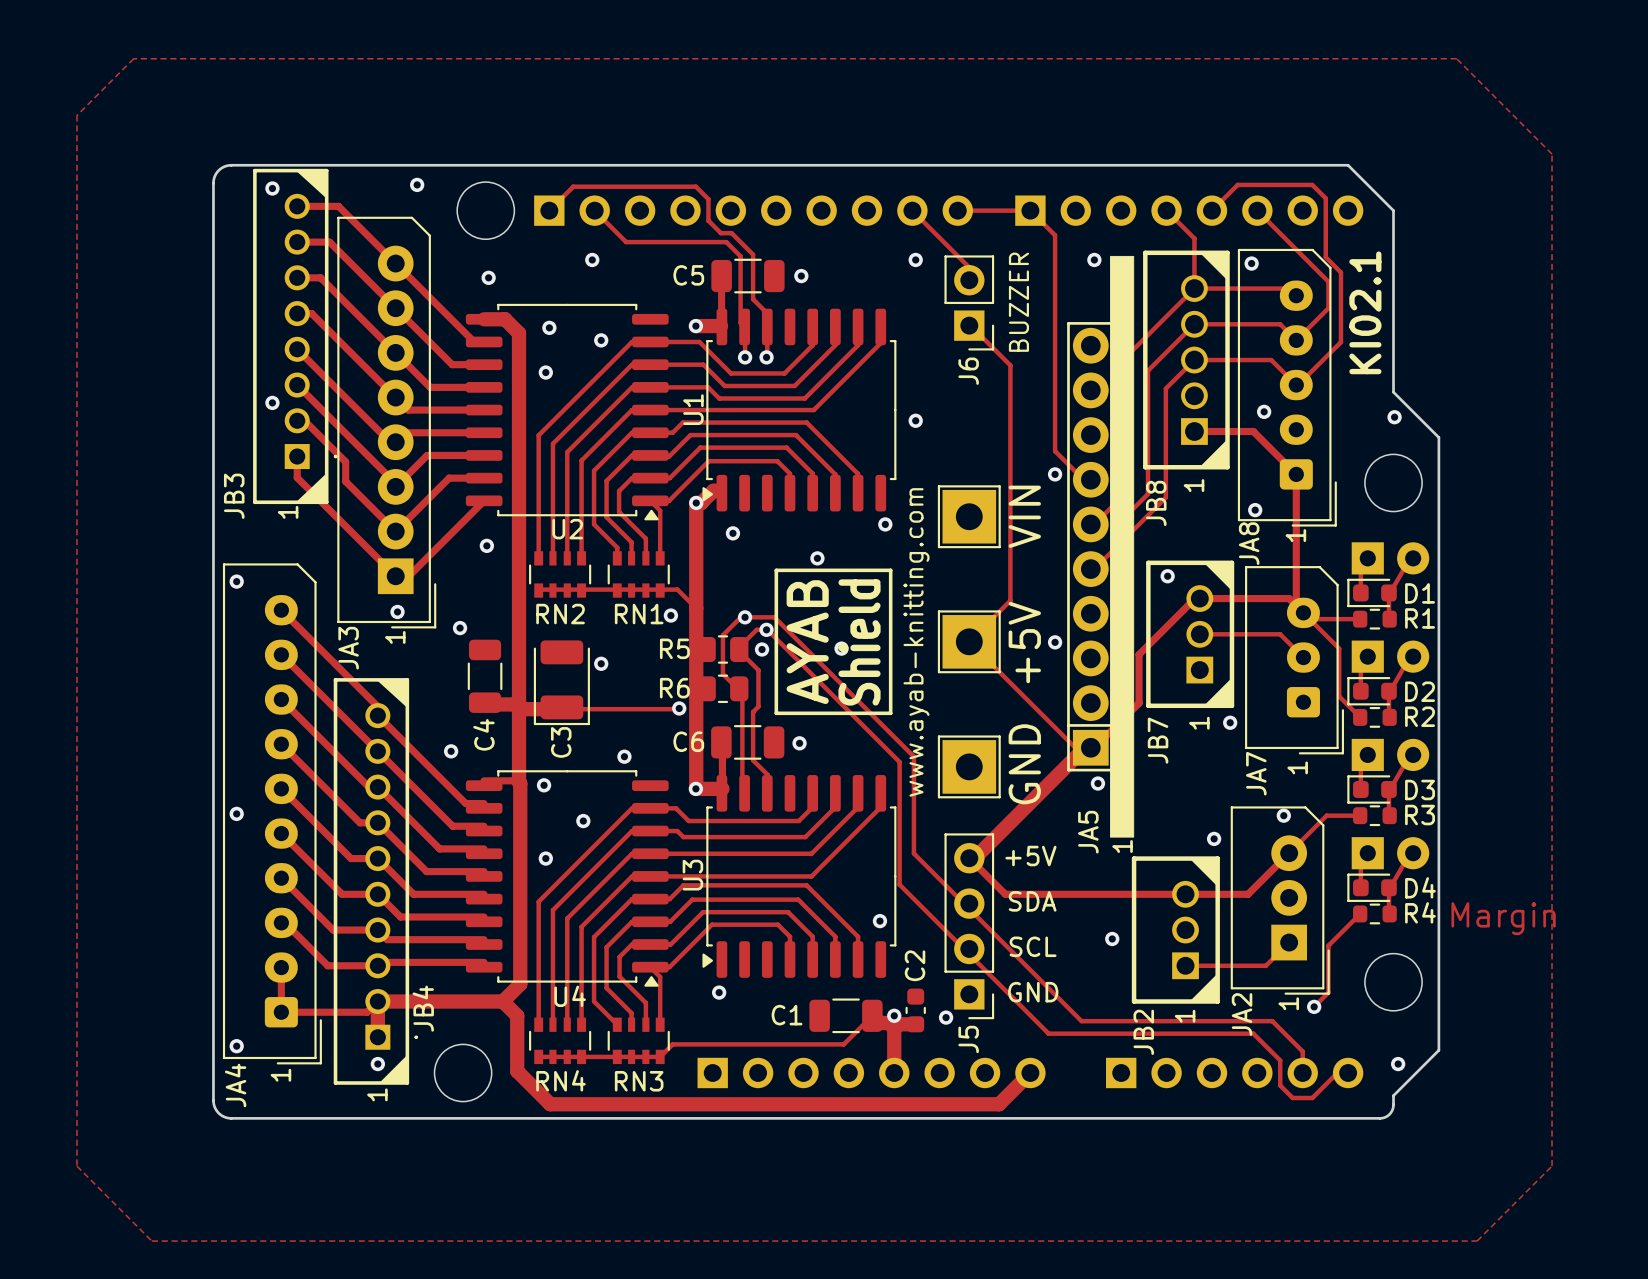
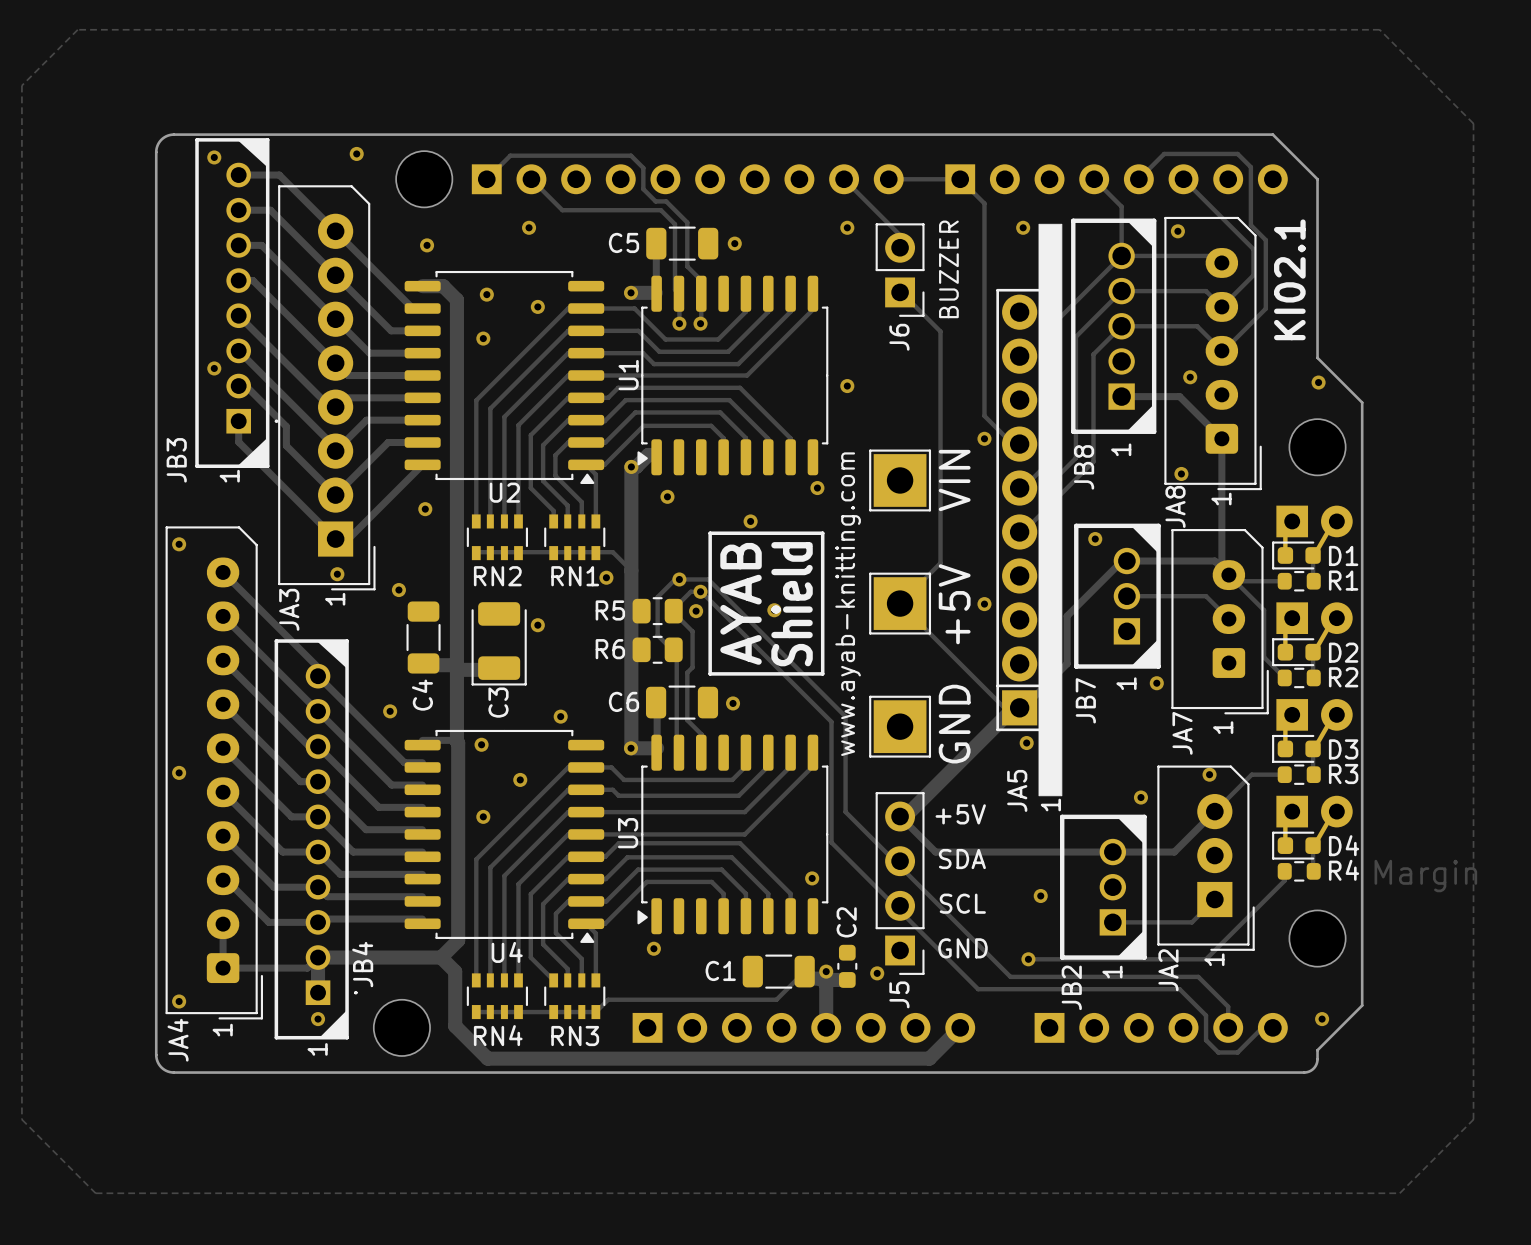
track: (679, 708) (561, 709) -> none
via: (679, 708) -> none
track: (1360, 913) (1328, 945) (1328, 992) (1314, 1006) -> (1284, 871) (1284, 880) (1206, 959) (1028, 959)
via: none -> (1028, 959)
via: (1314, 1006) -> none

